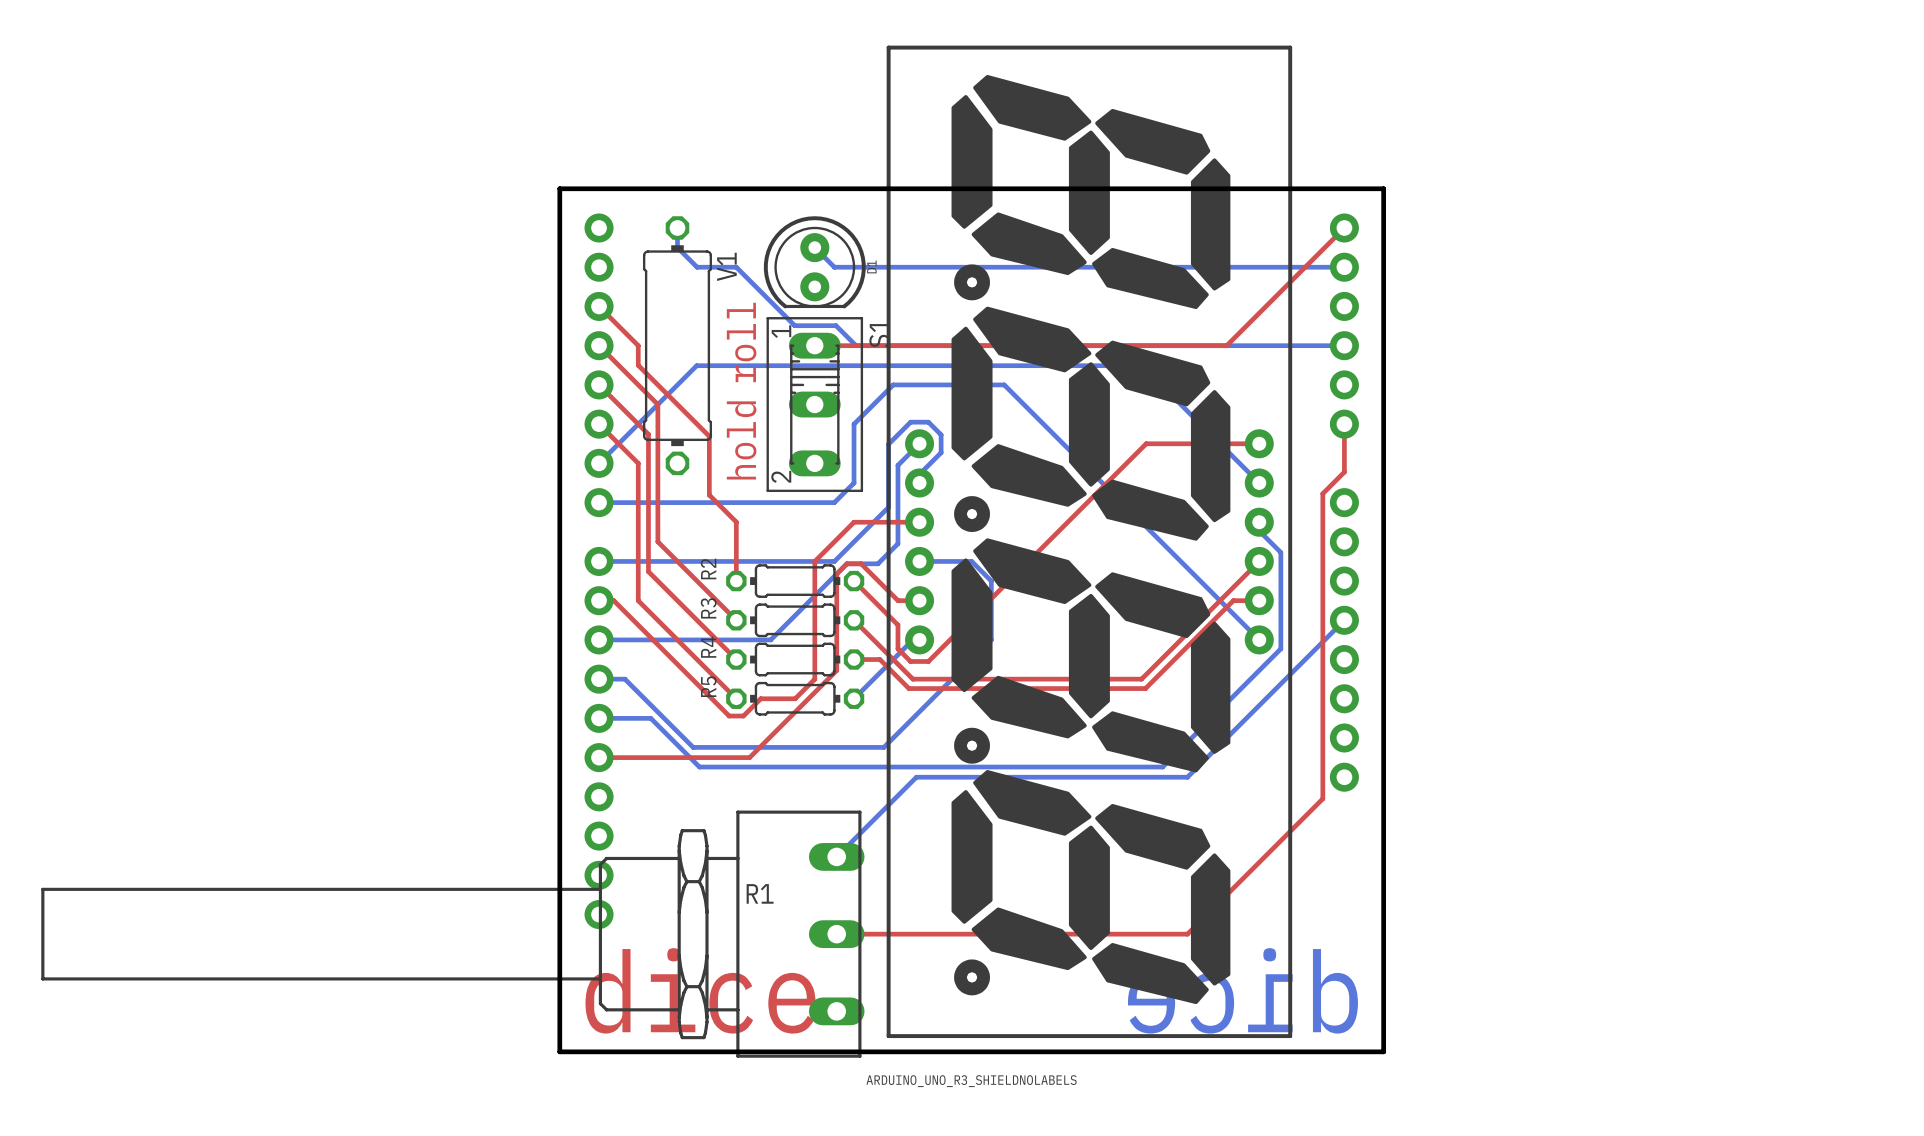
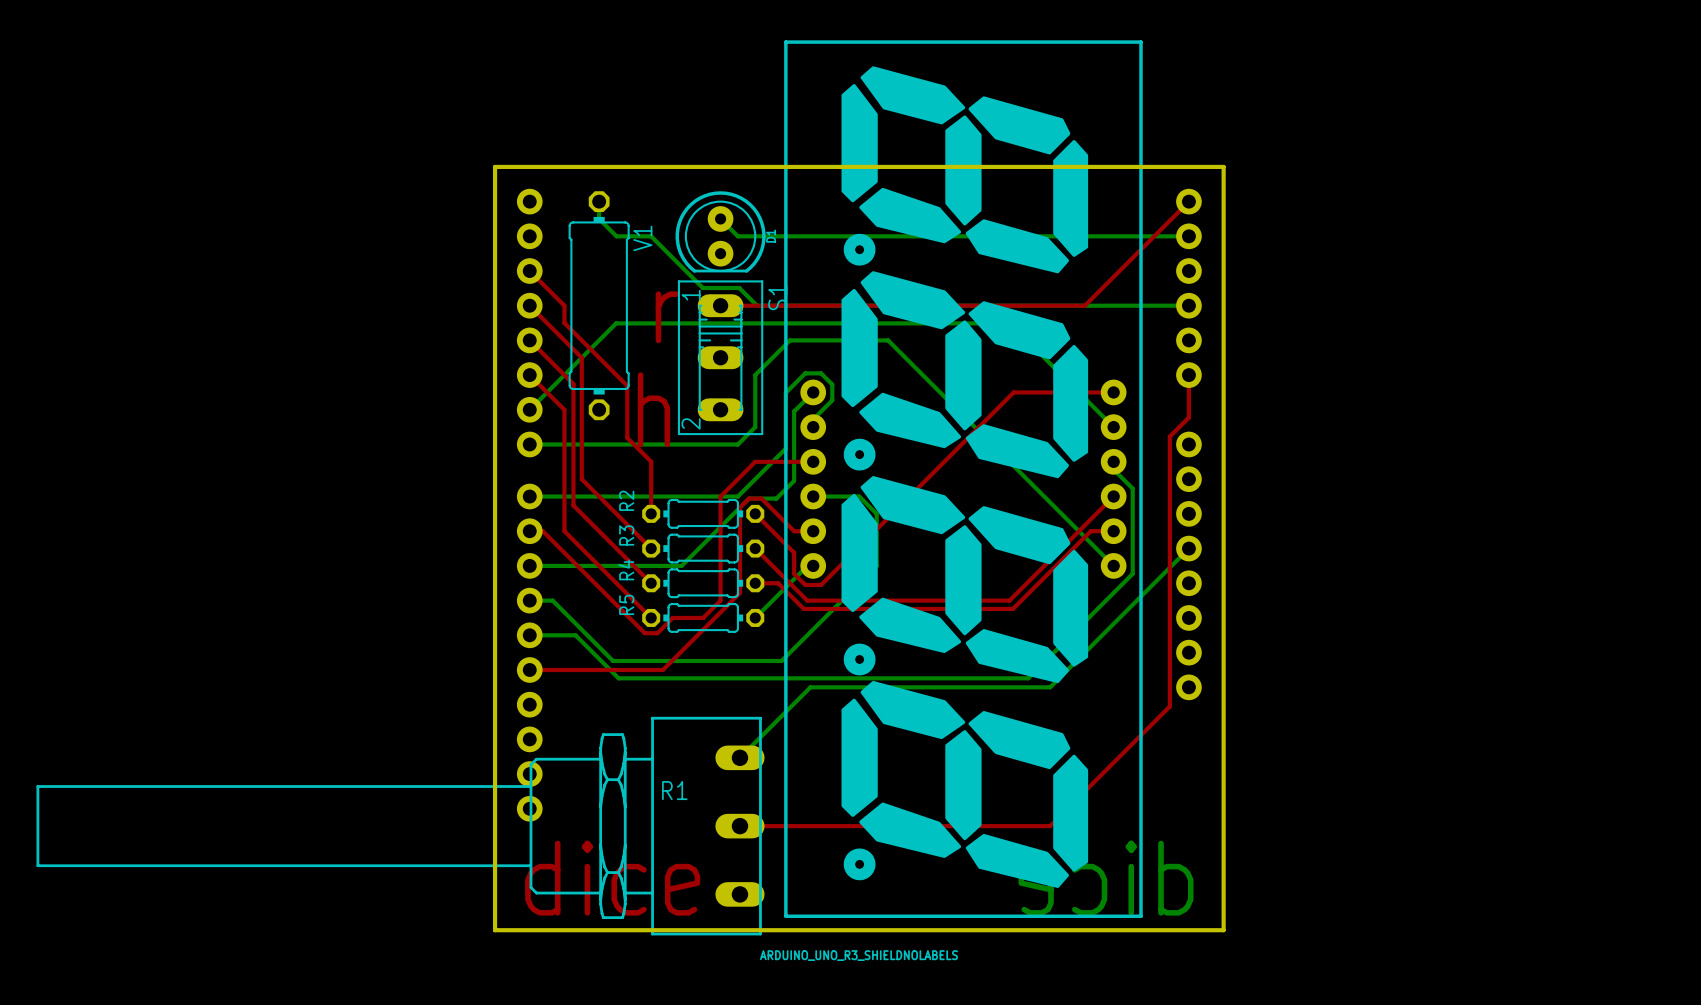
text: roll (741, 342) -> none
text: none -> r (667, 317)
text: hold (741, 440) -> none
text: none -> h (653, 409)

